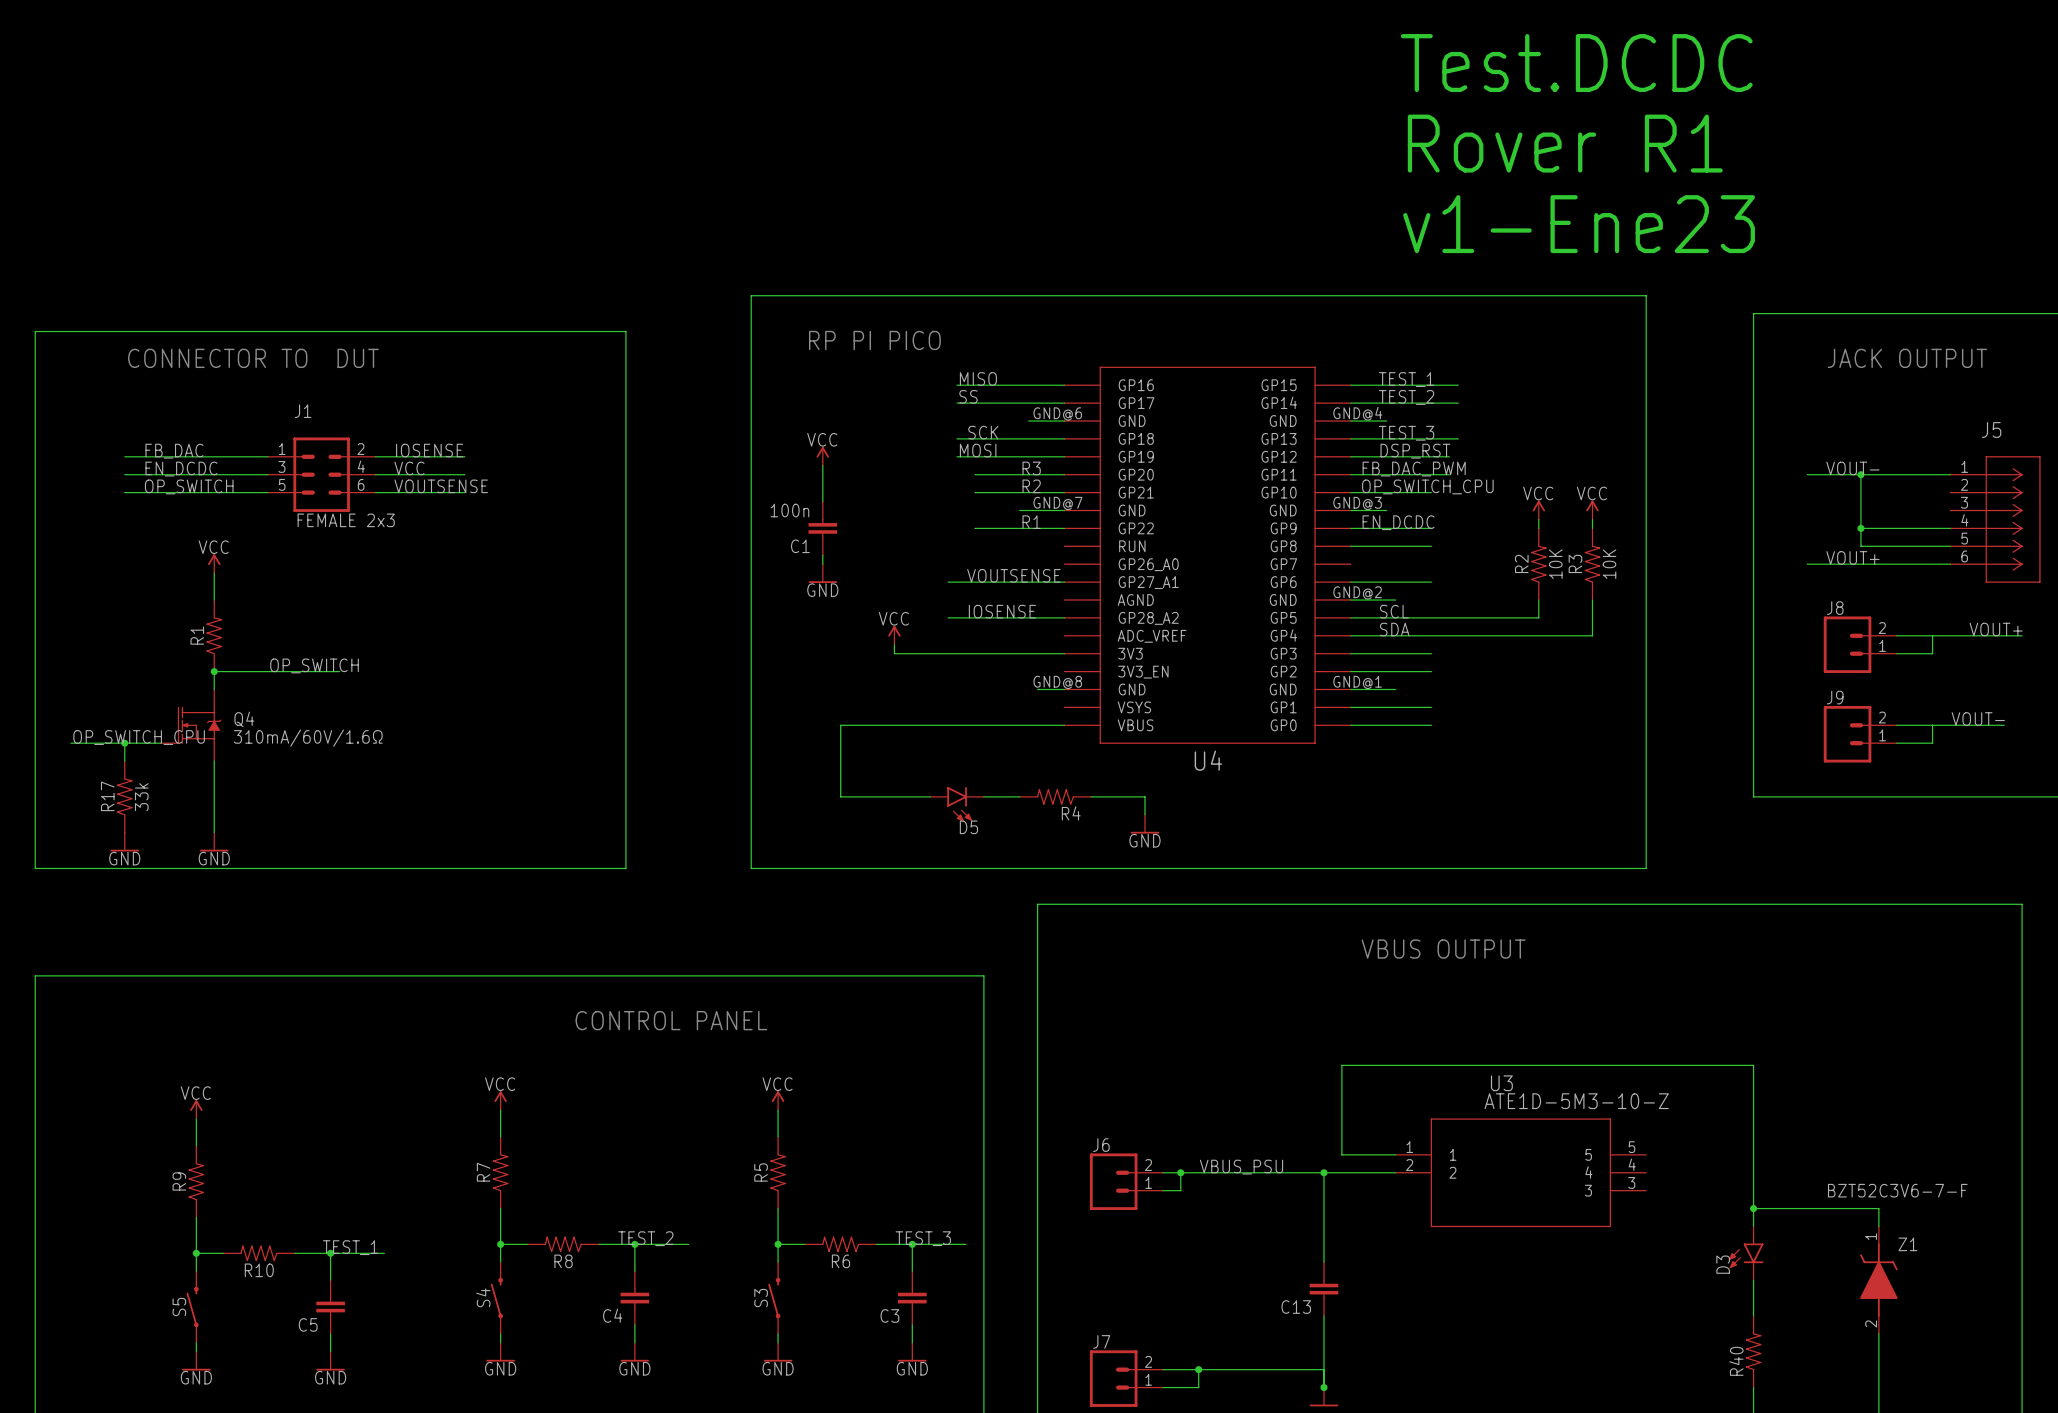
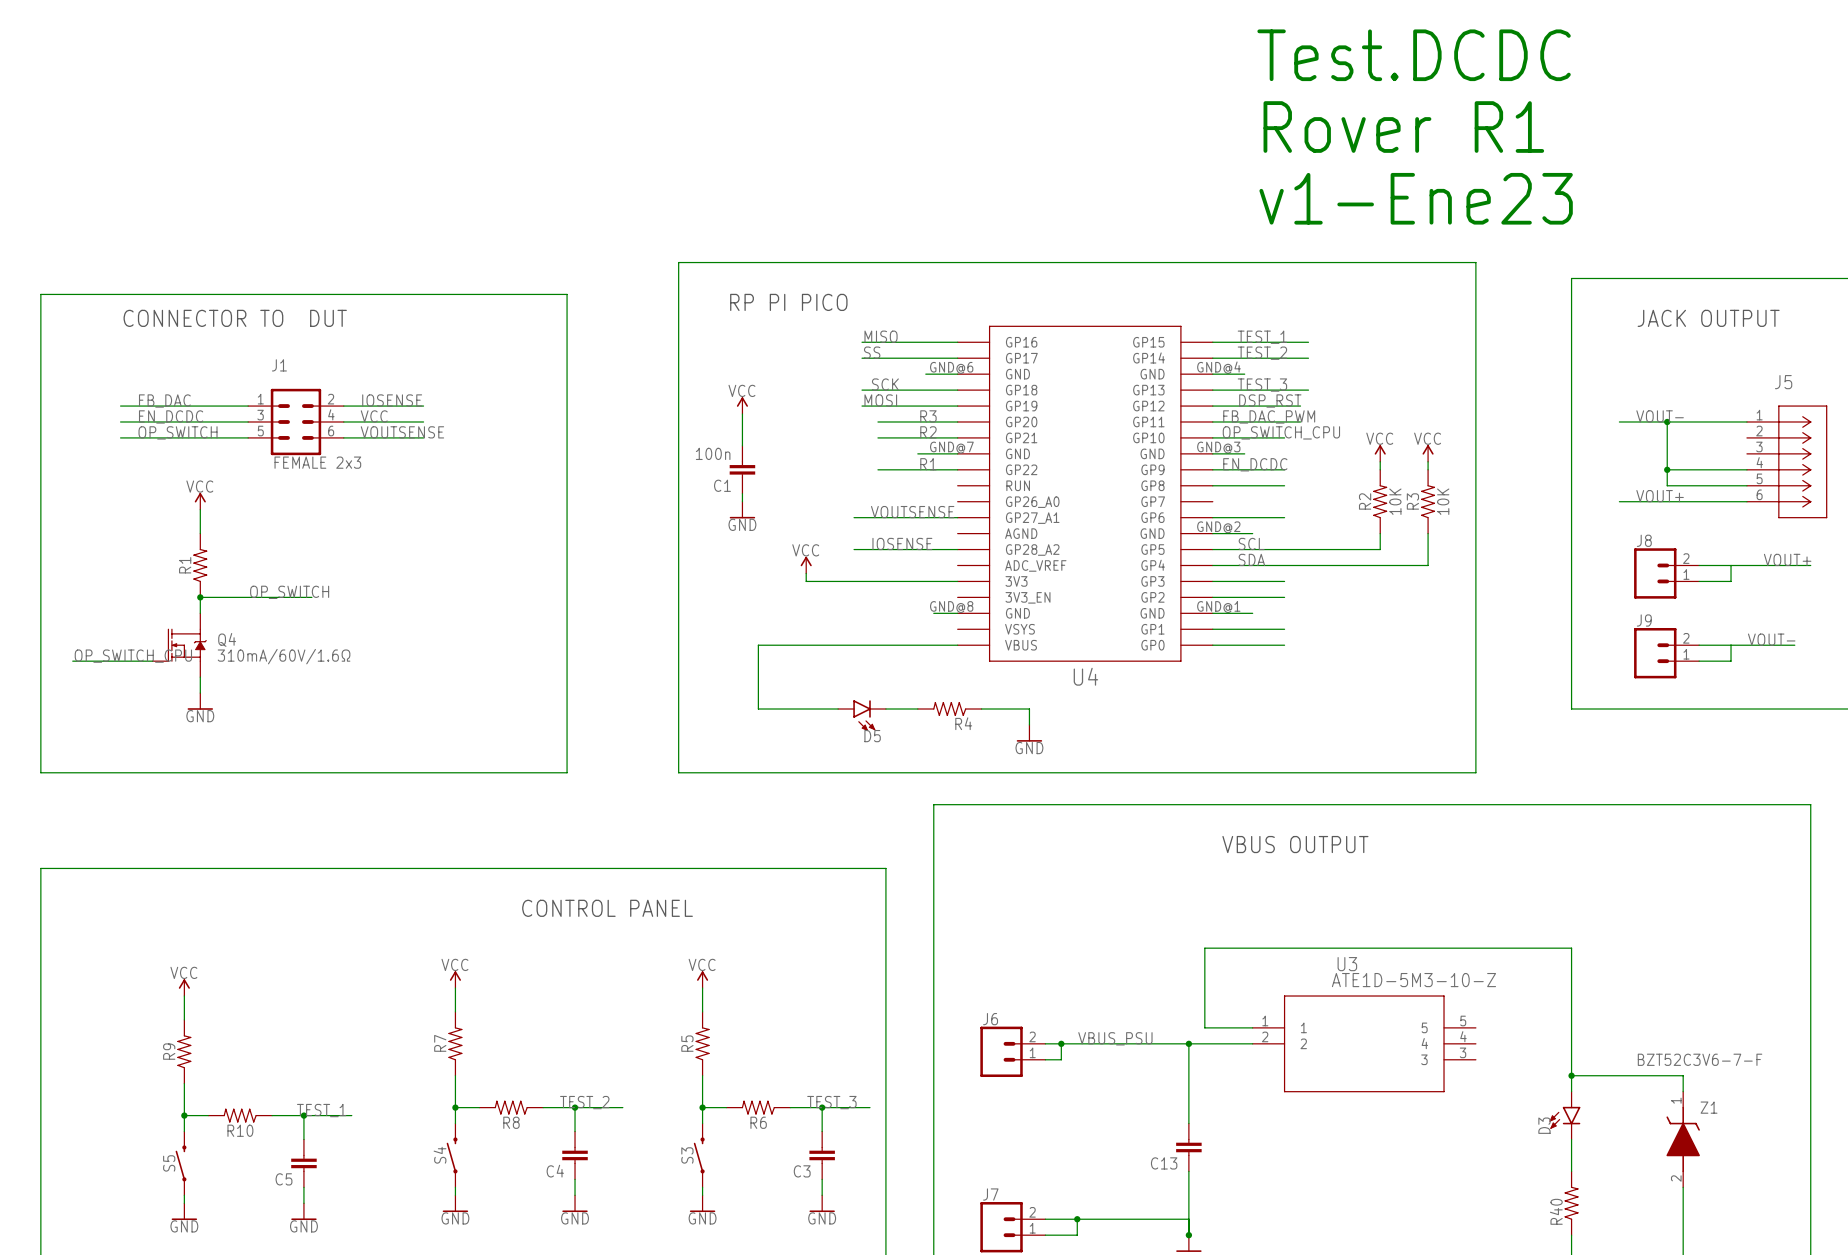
wire: (124, 743) (124, 761) -> none
junction: (124, 743) -> none
wire: (214, 778) (214, 832) -> none
power symbol: none -> GND (200, 701)
R17: 33k (124, 796) -> none
power symbol: GND (124, 842) -> none
power symbol: GND (214, 842) -> none

